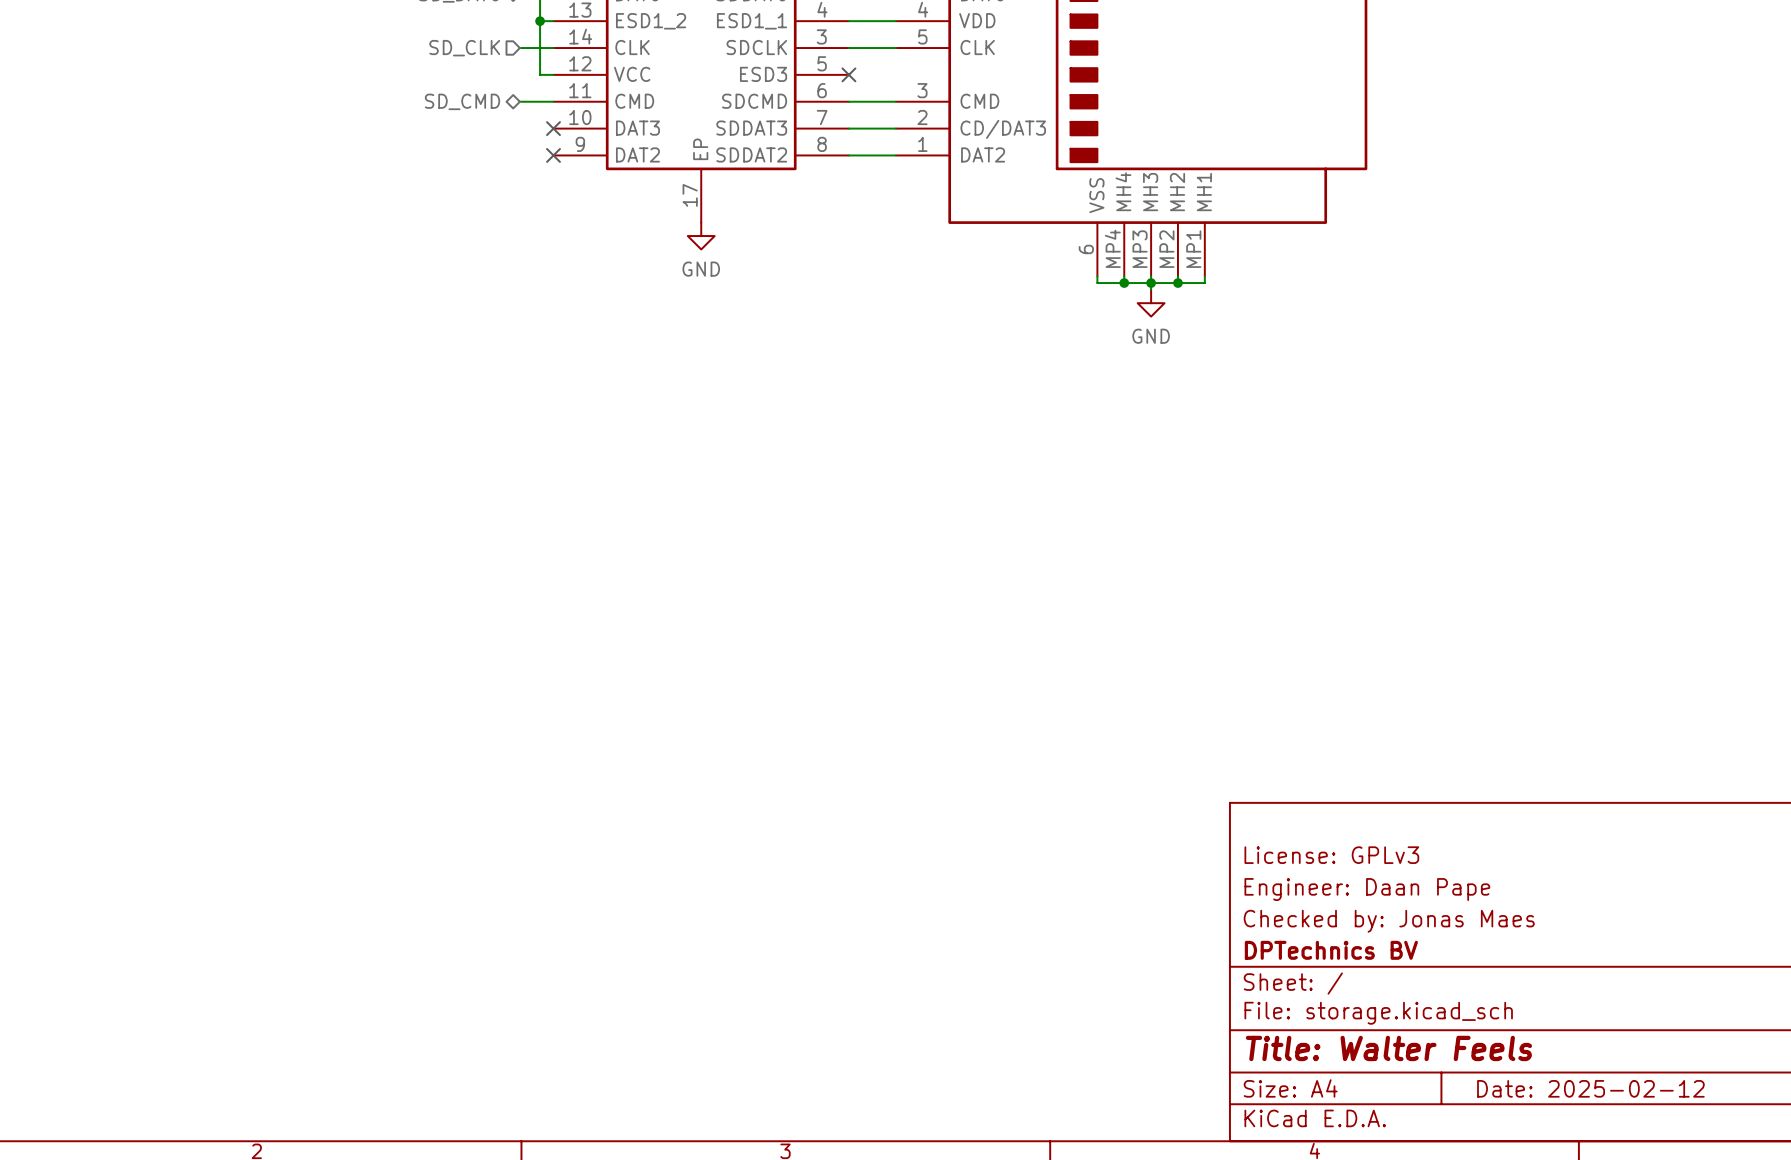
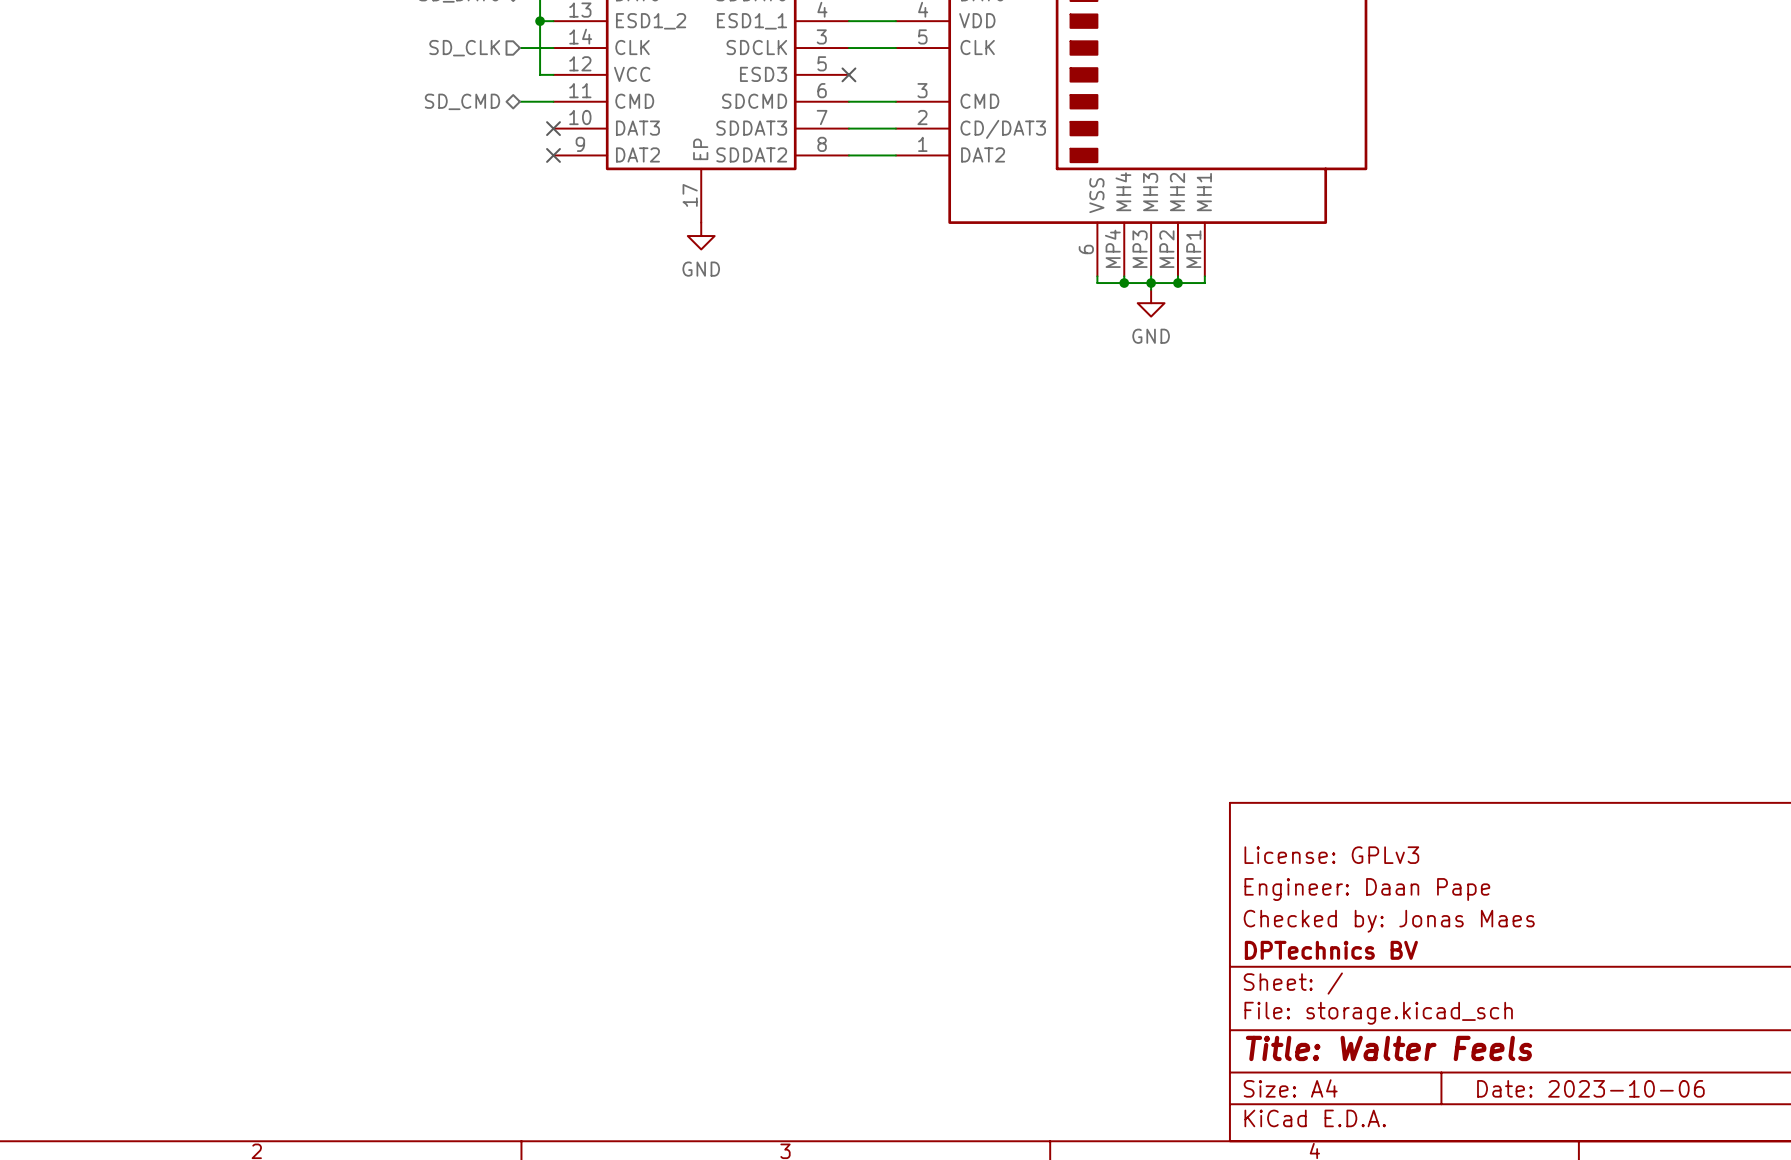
title block: Date: 2025-02-12 (1590, 1088) -> Date: 2023-10-06 (1590, 1088)

